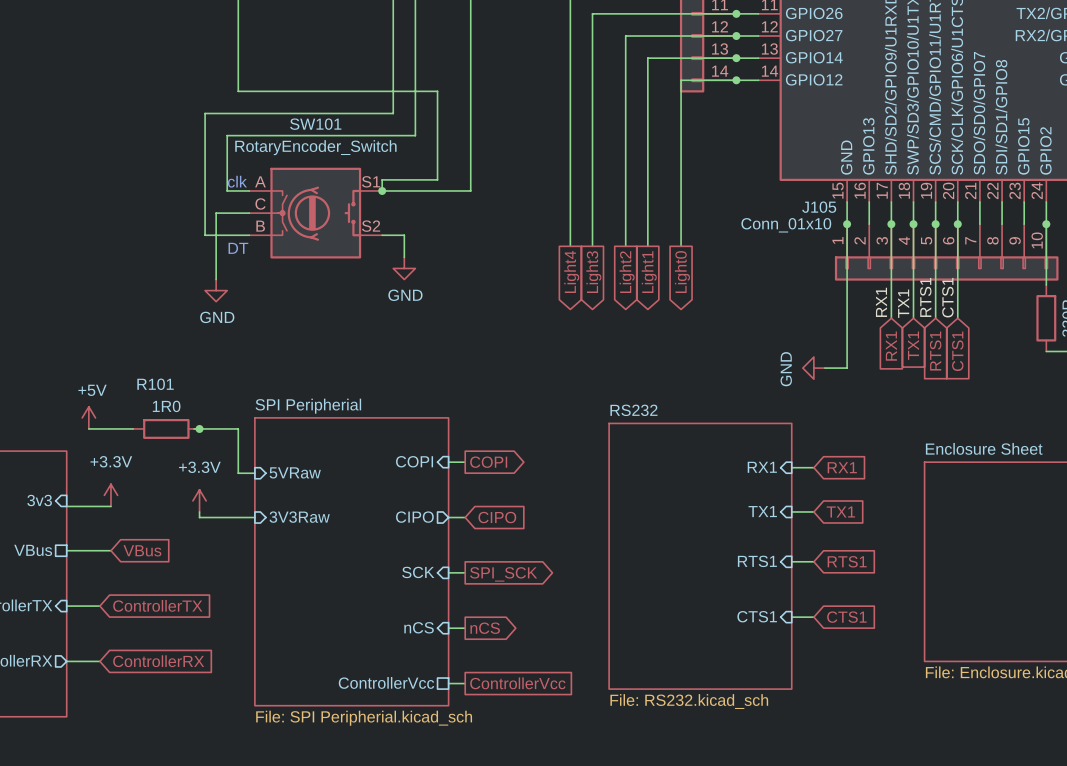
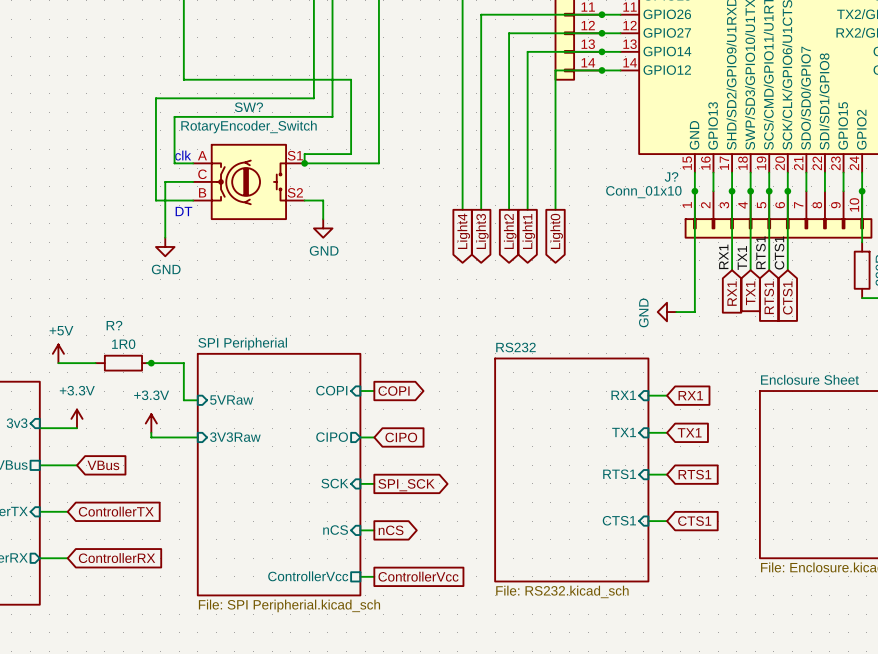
SW101 name: SW101 (315, 124) -> SW? (248, 107)
J105 name: J105 (819, 207) -> J? (671, 176)
R101 name: R101 (155, 384) -> R? (114, 325)

